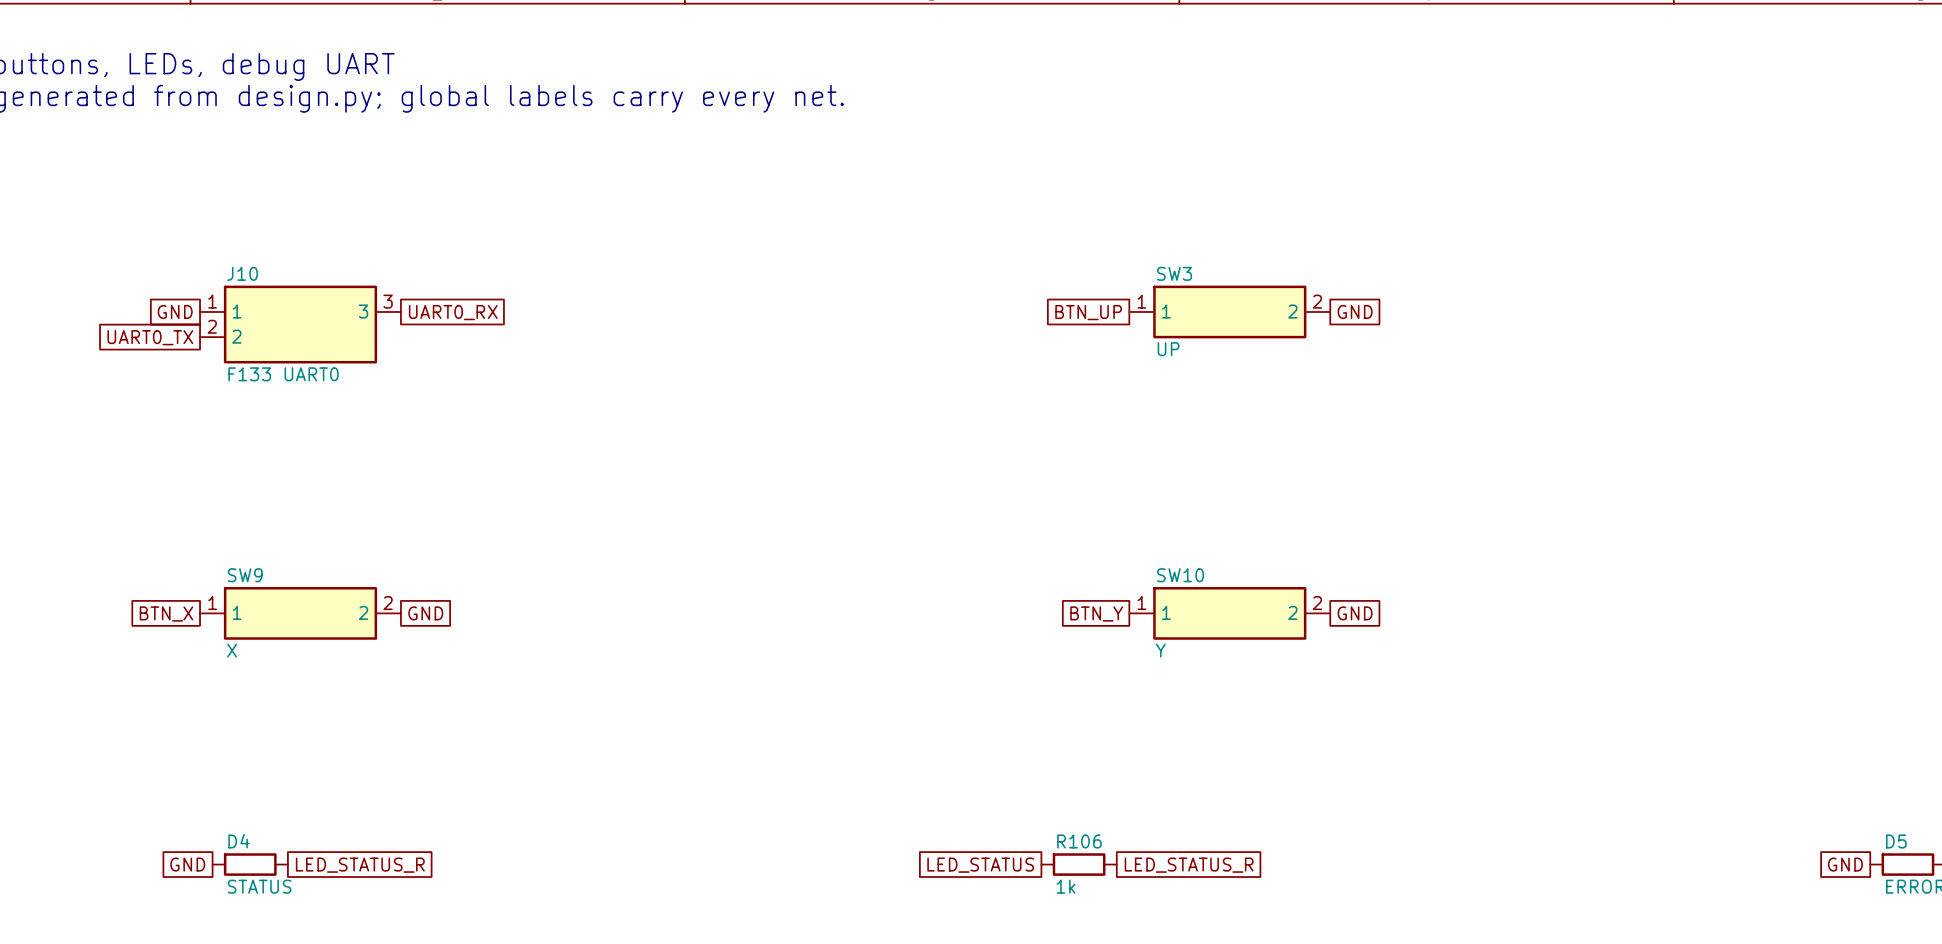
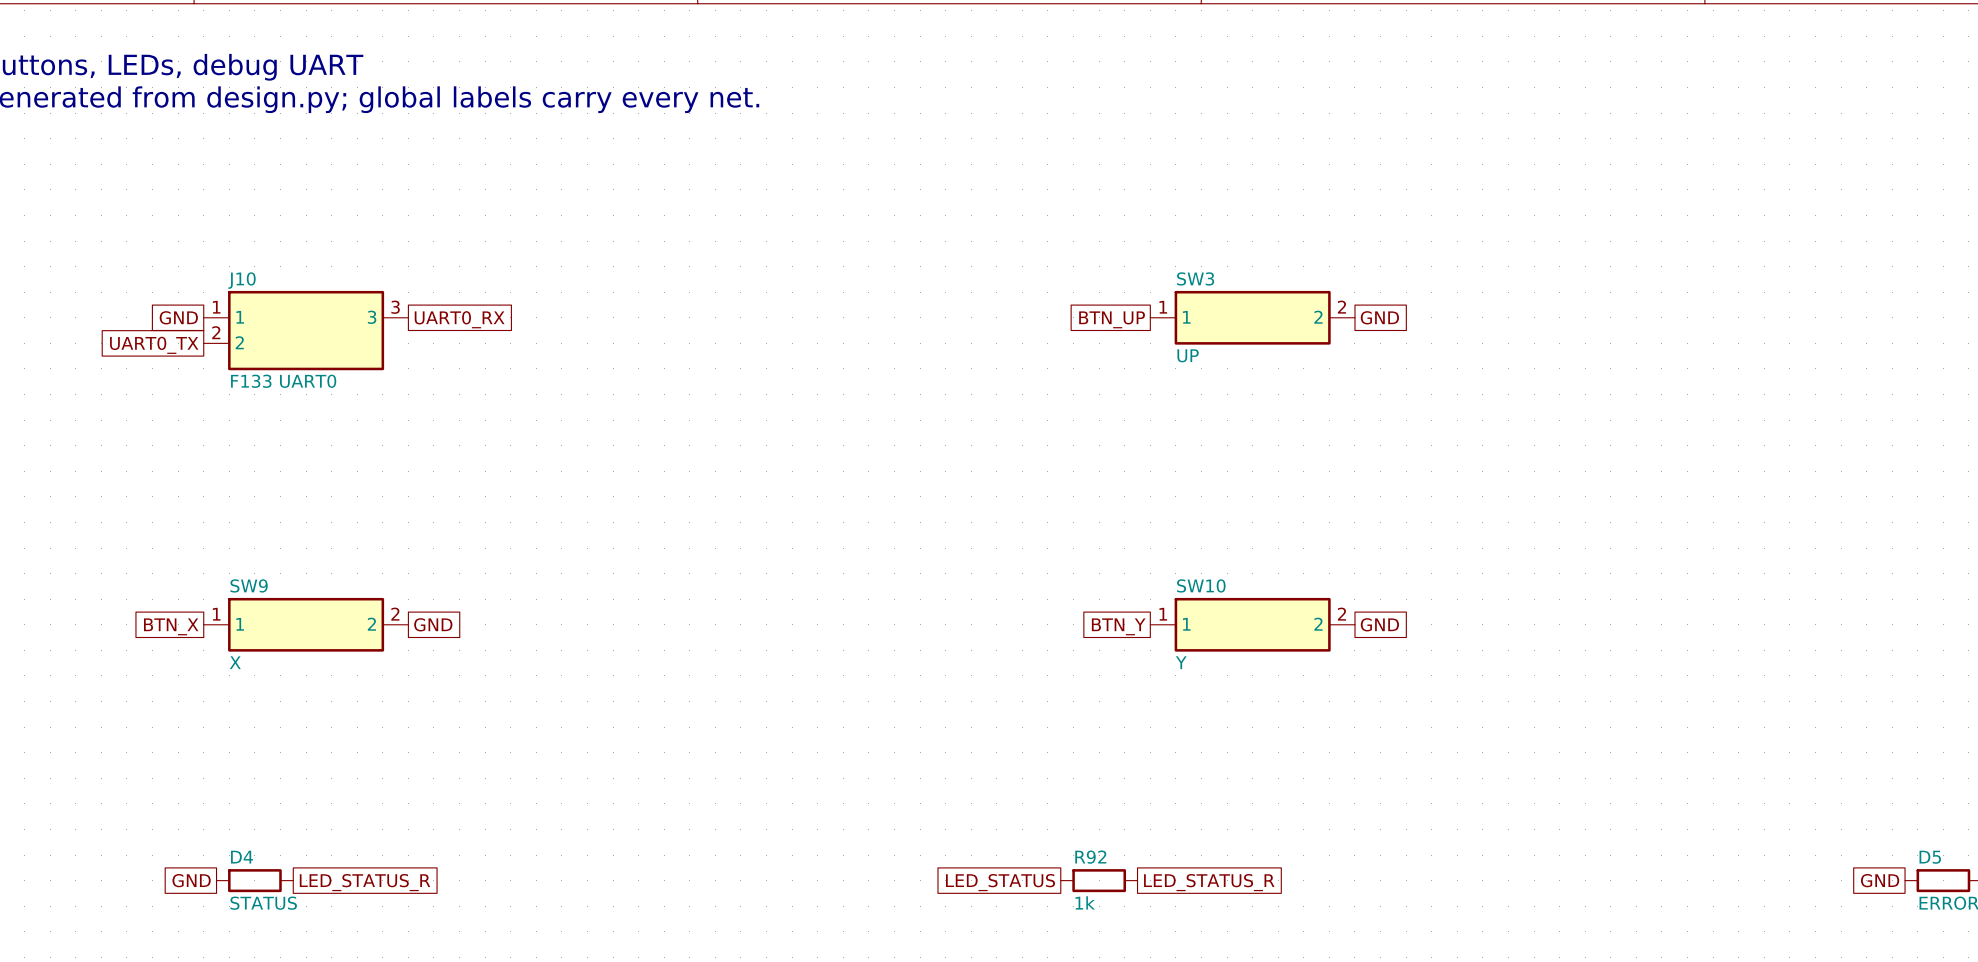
R106 name: R106 (1079, 841) -> R92 (1090, 857)

